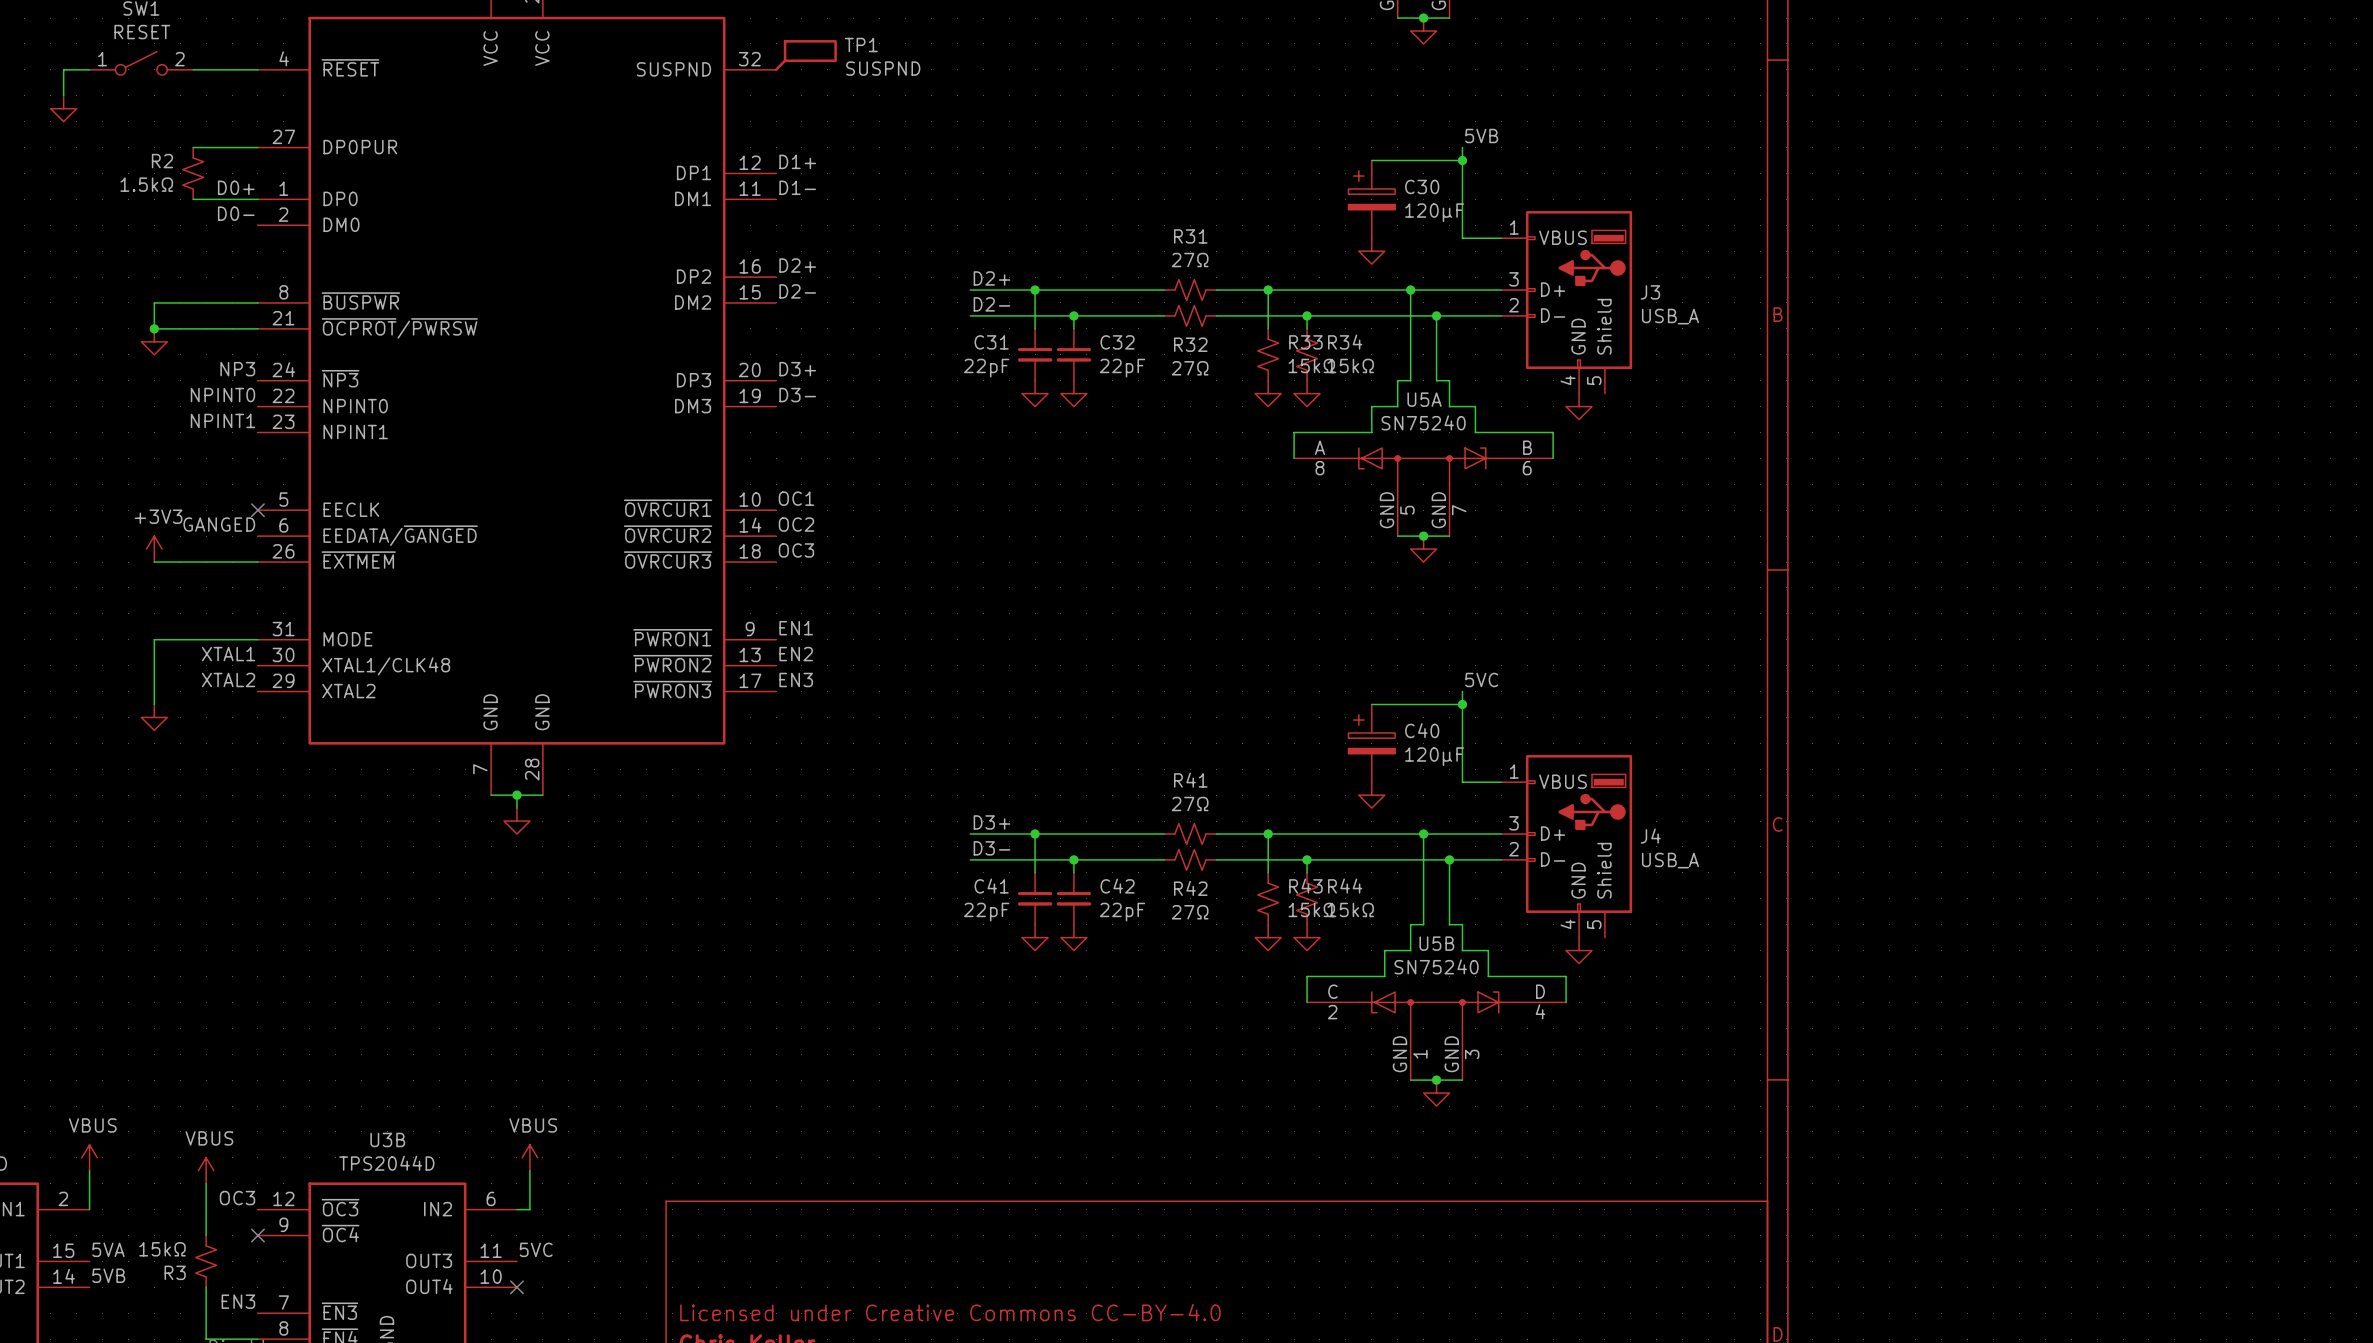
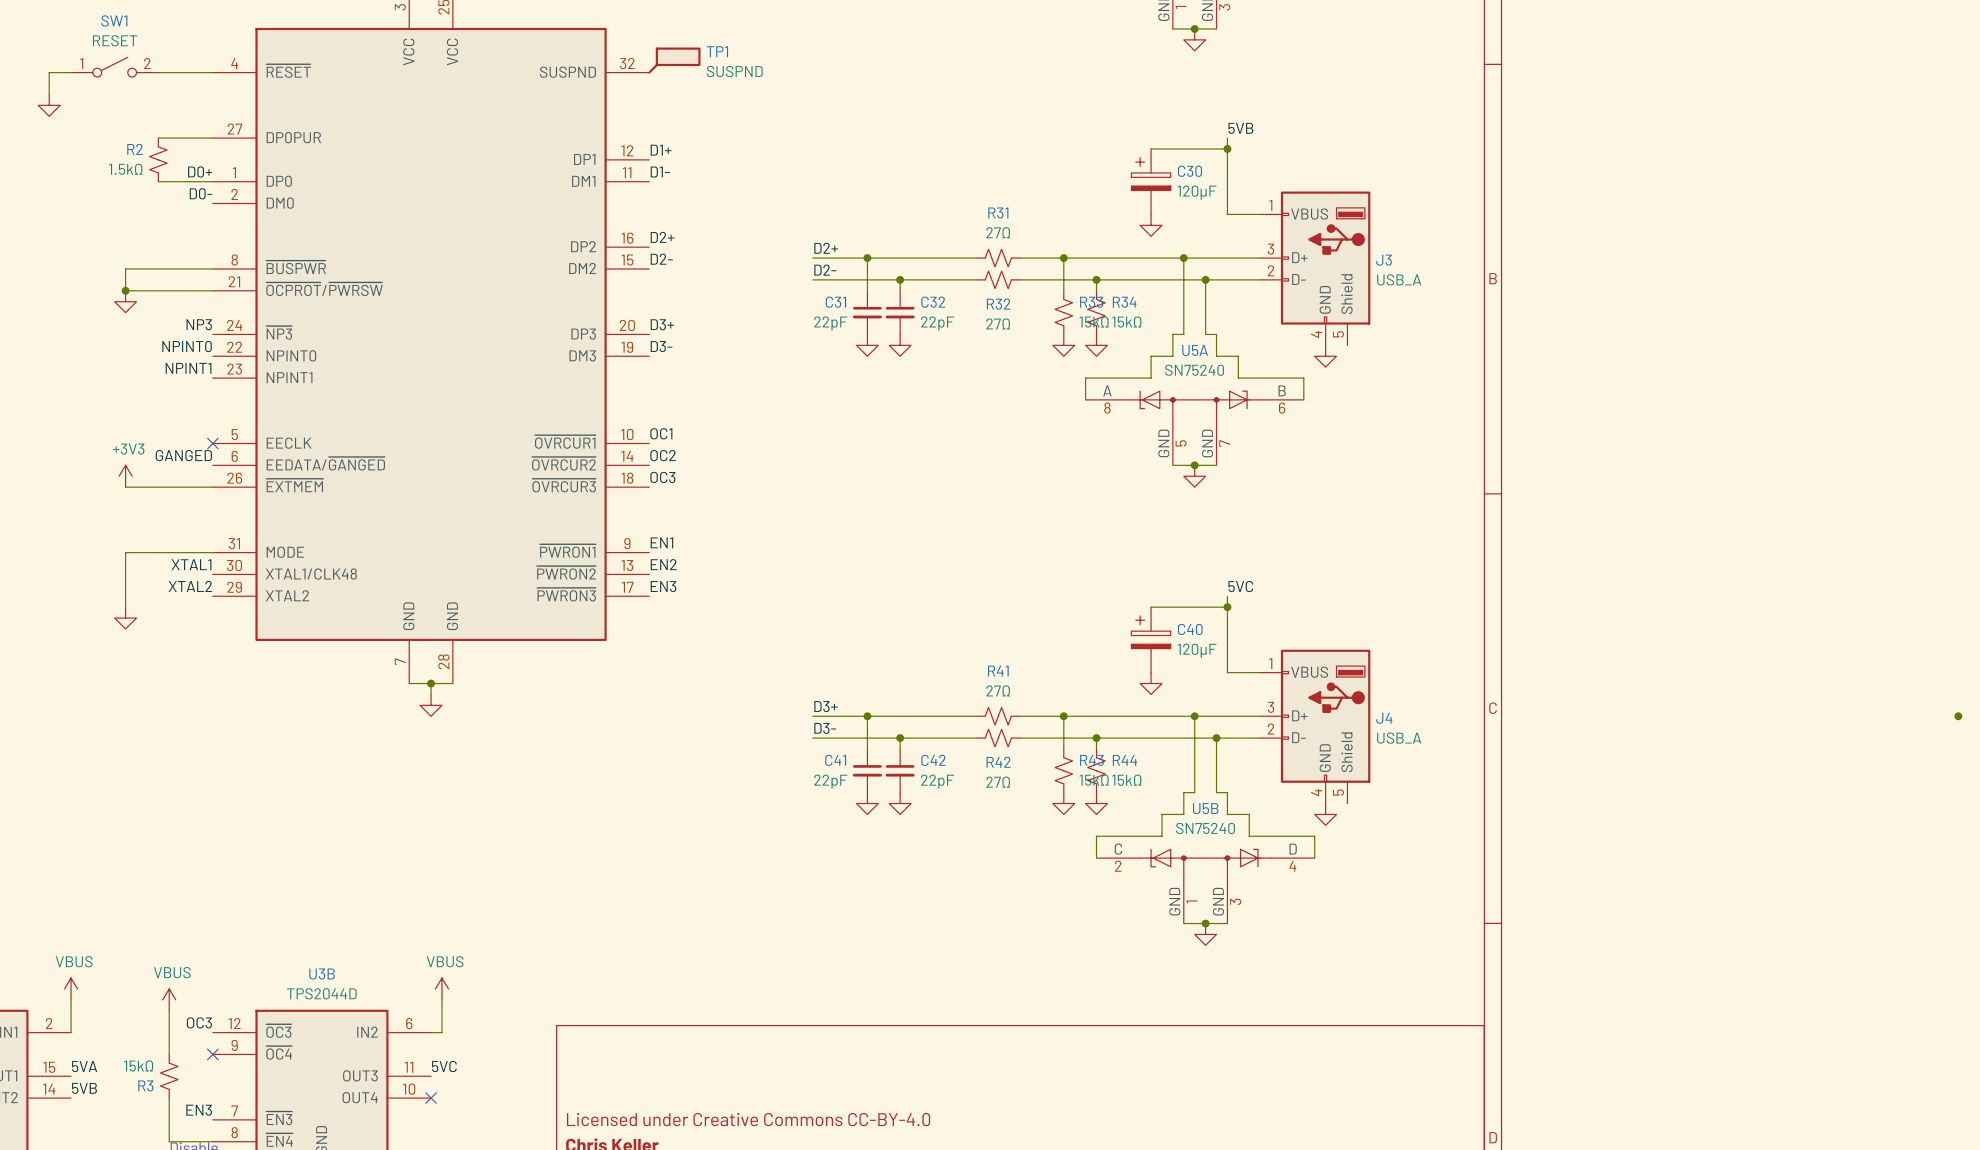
junction: none -> (1958, 716)

